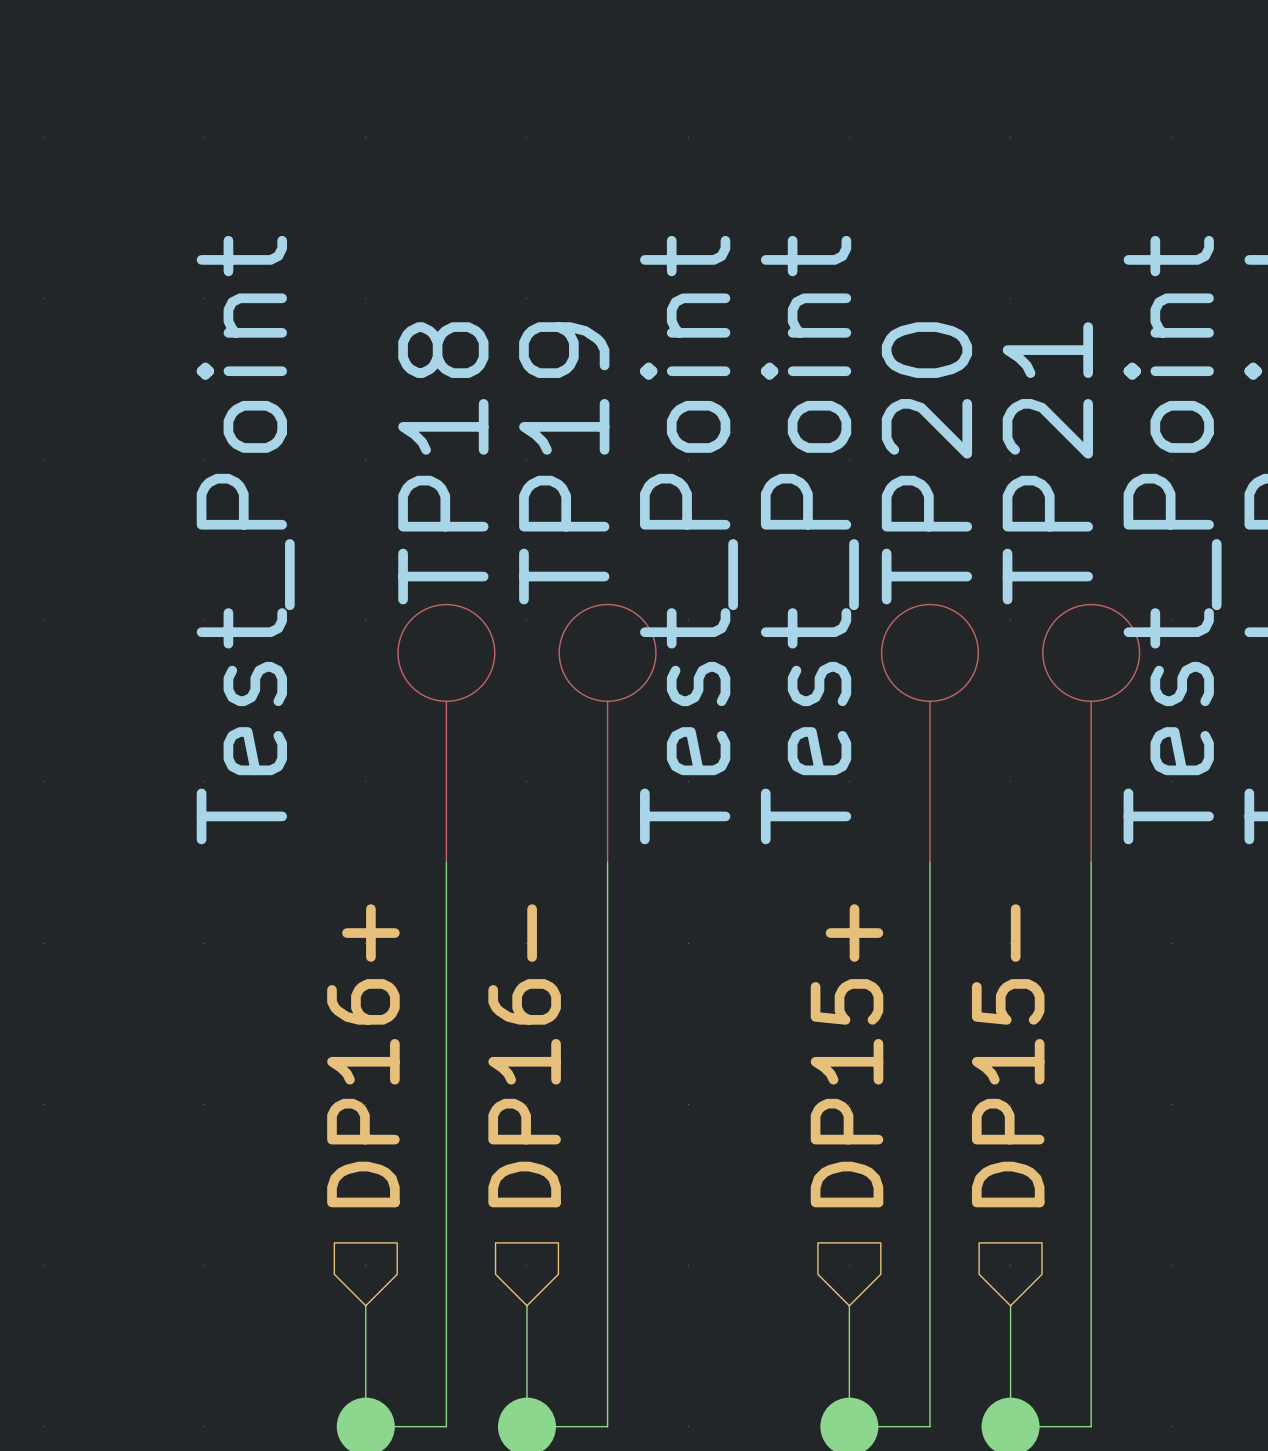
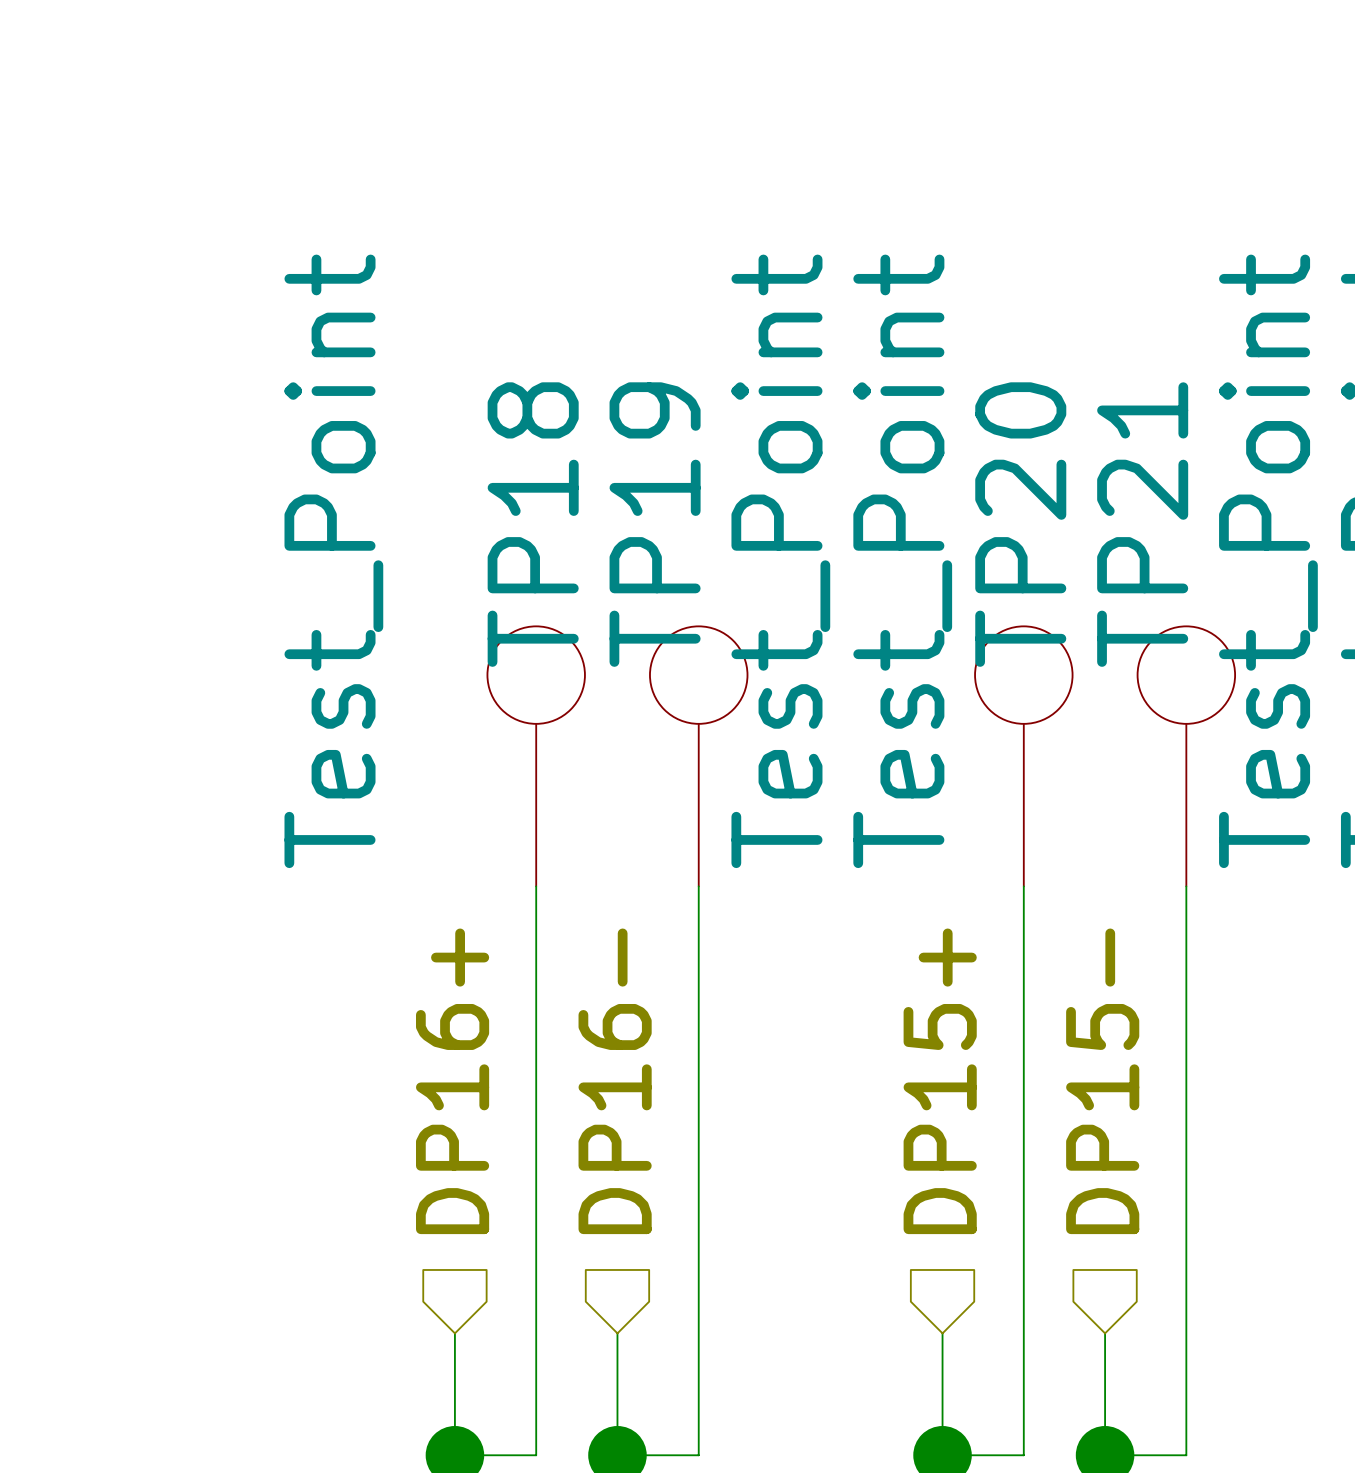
TP18 name position: TP18 (443, 463) -> TP18 (533, 524)
TP19 name position: TP19 (564, 463) -> TP19 (655, 524)
TP20 name position: TP20 (926, 463) -> TP20 (1020, 524)
TP21 name position: TP21 (1047, 463) -> TP21 (1142, 524)

